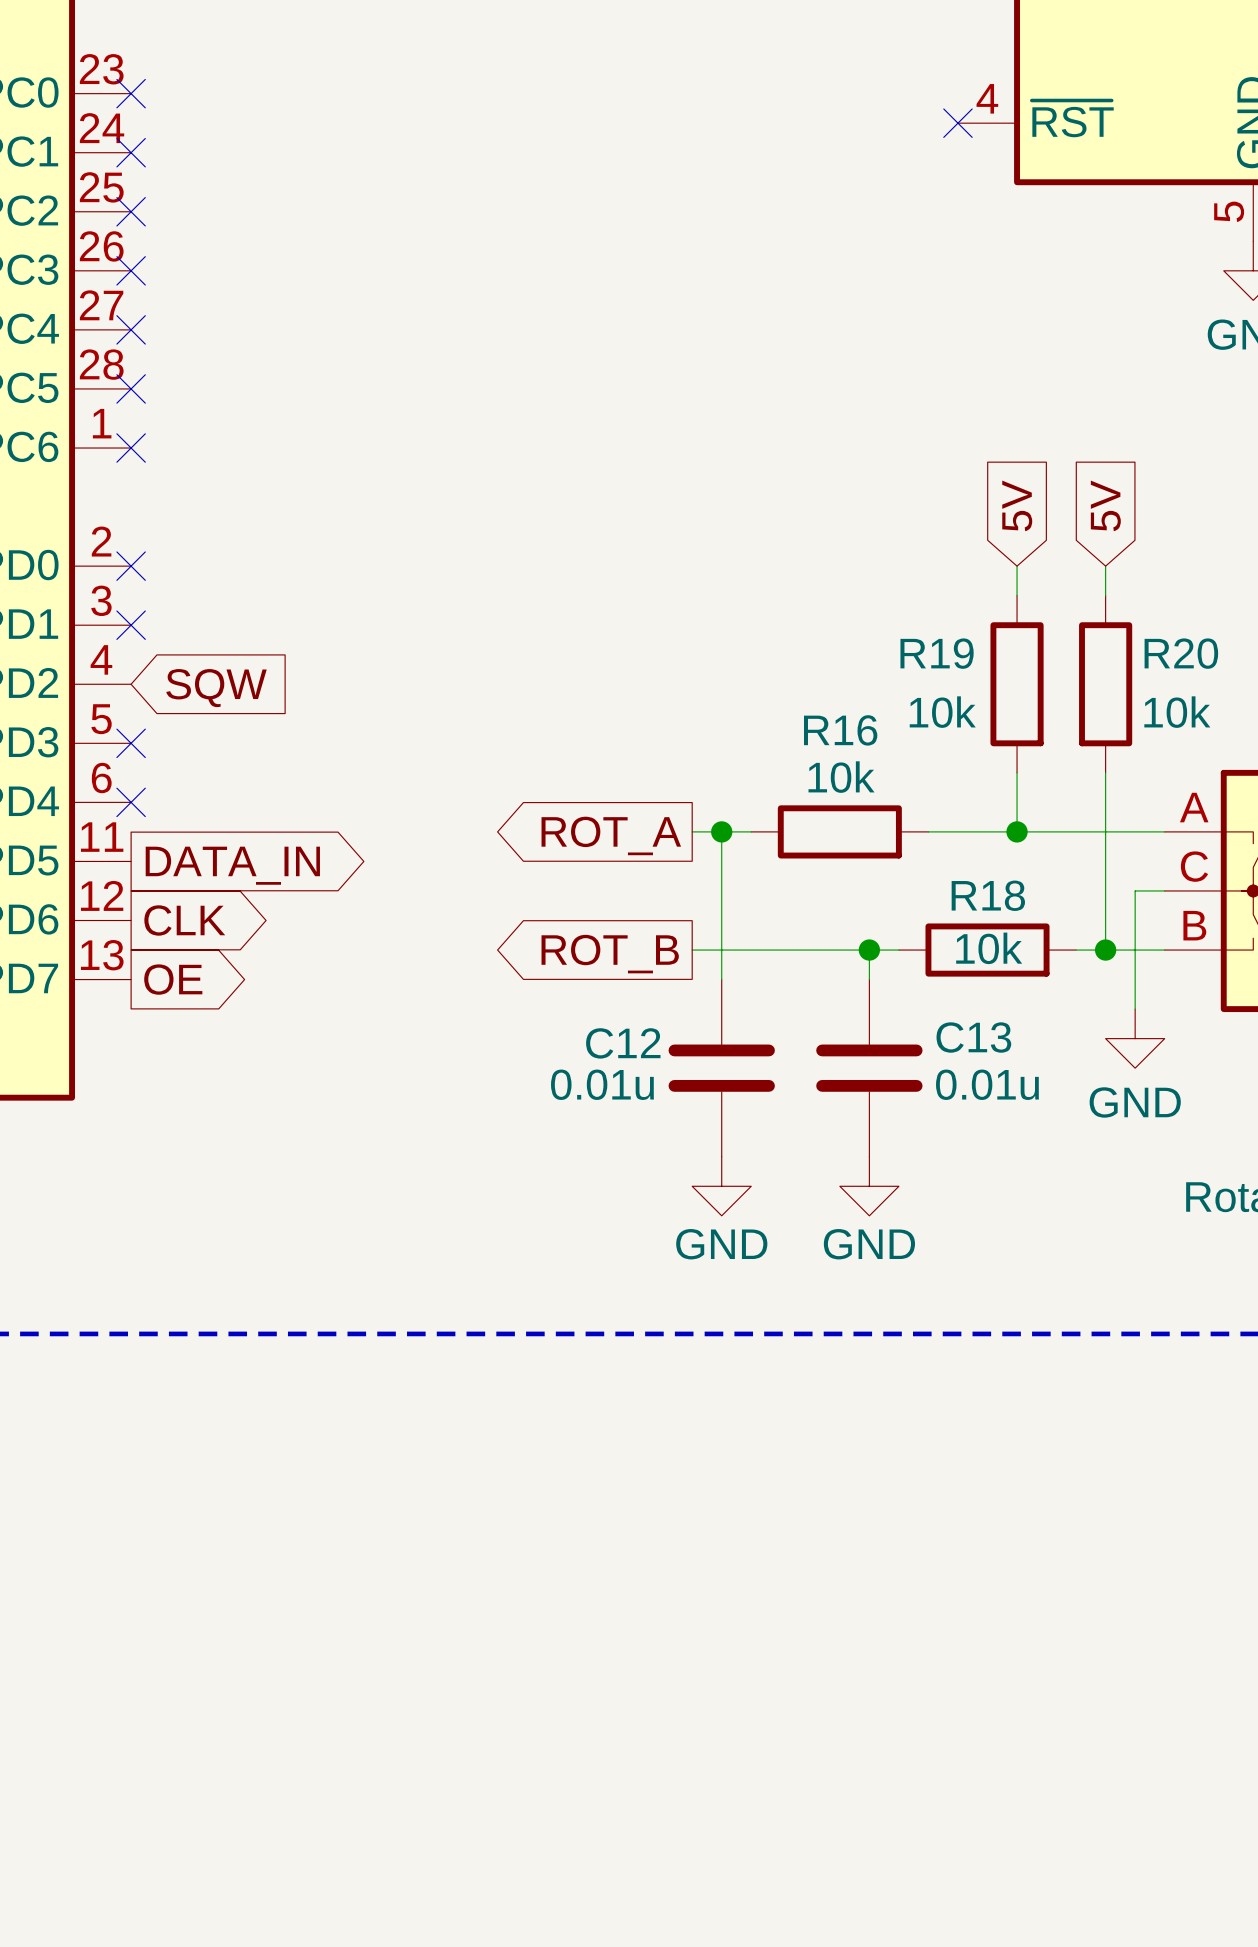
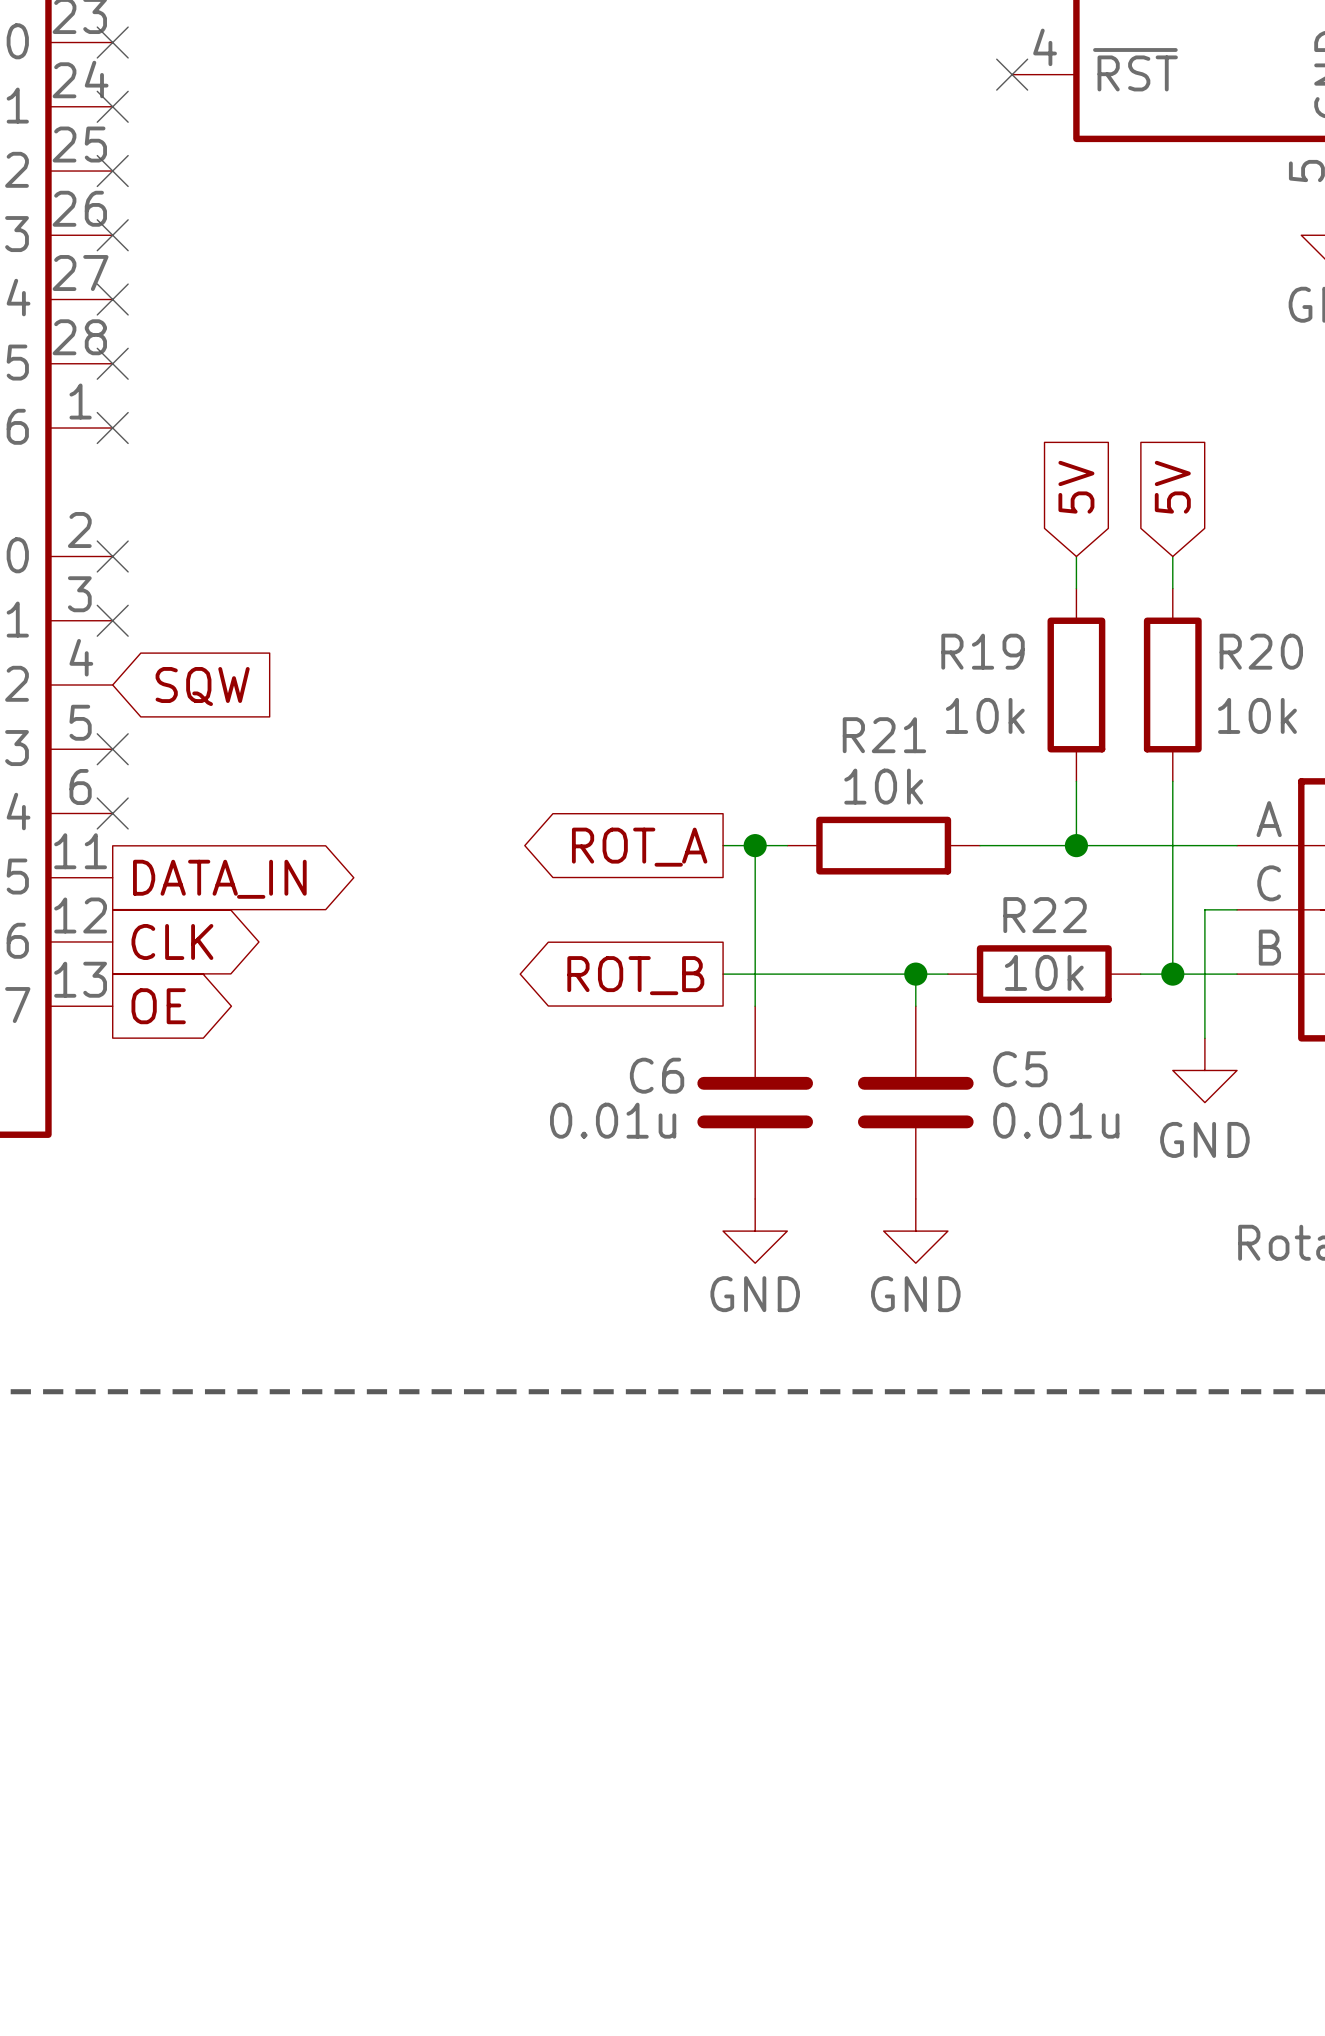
R16 name: R16 (840, 730) -> R21 (884, 735)
R18 name: R18 (988, 895) -> R22 (1045, 915)
C13 name: C13 (973, 1037) -> C5 (1020, 1069)
C12 name: C12 (623, 1043) -> C6 (657, 1075)

